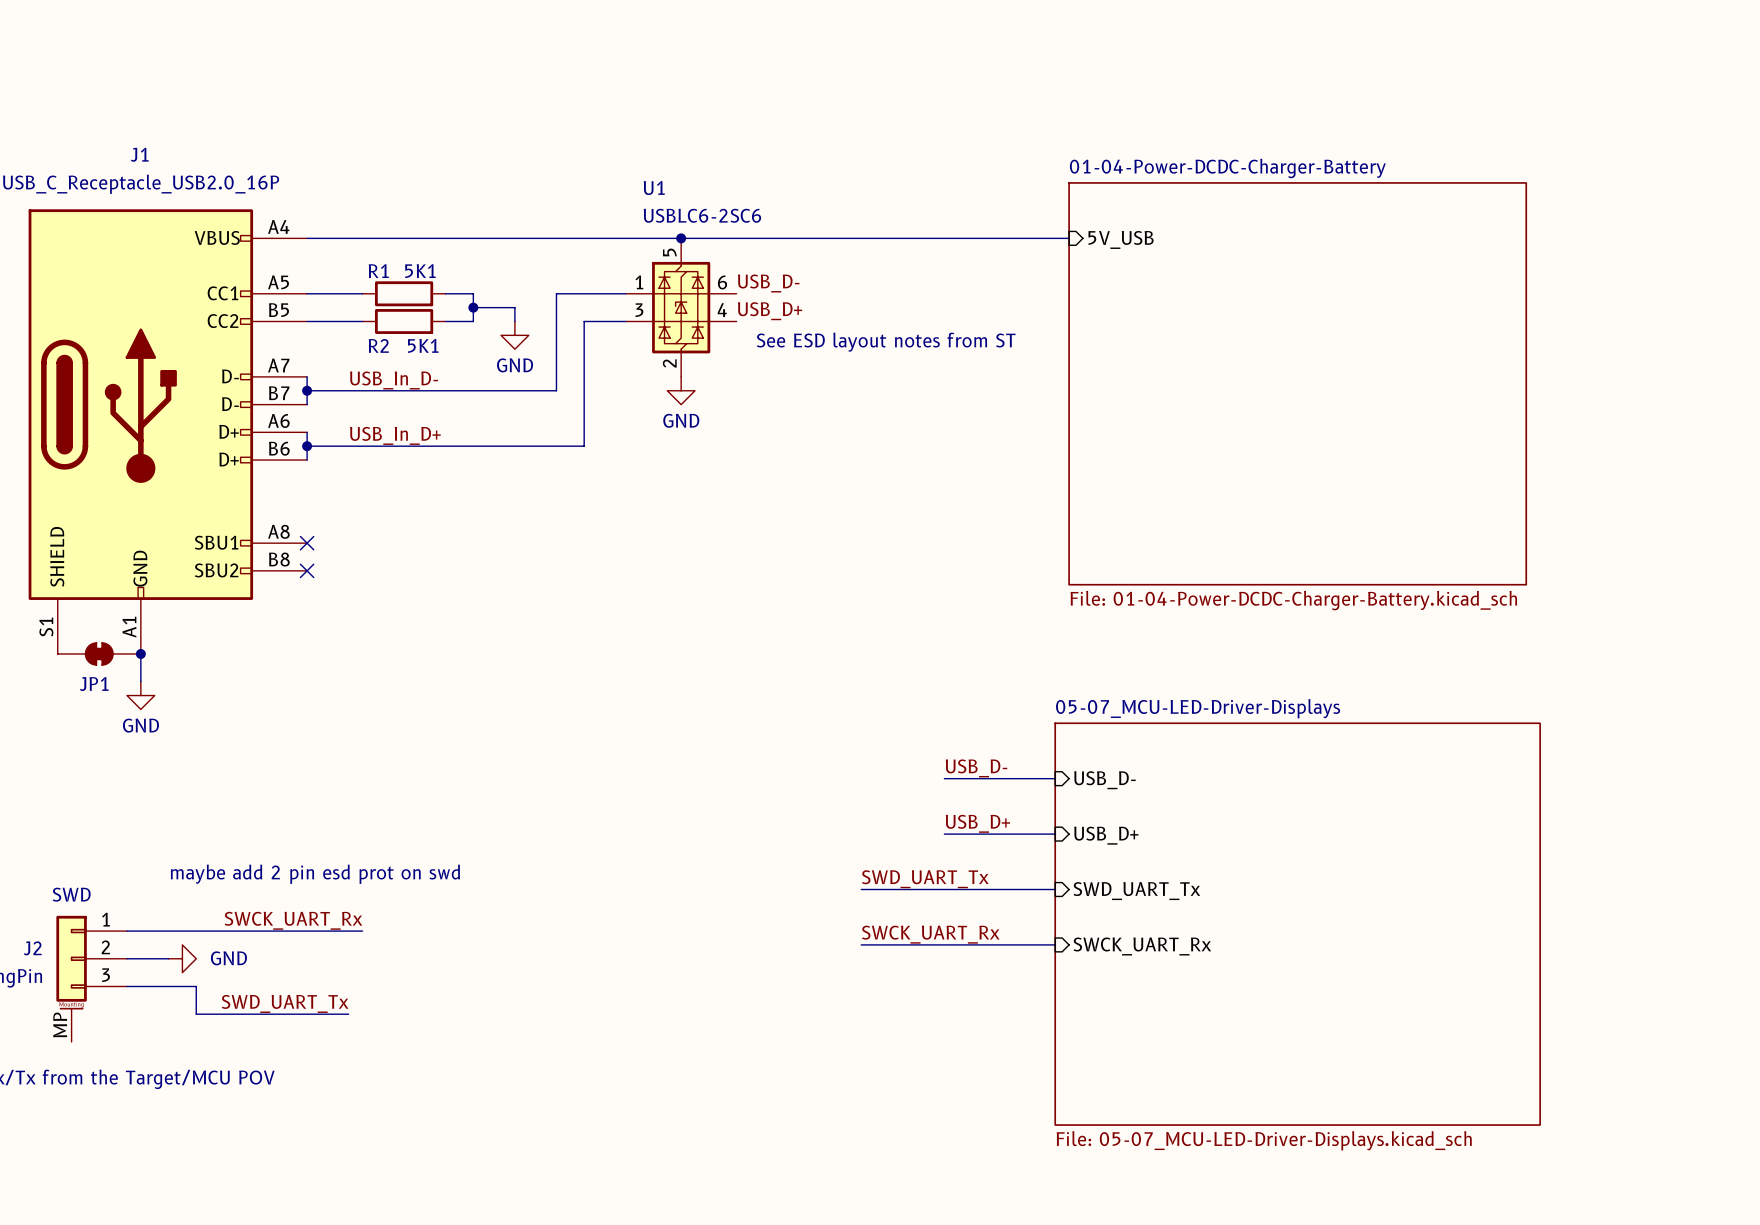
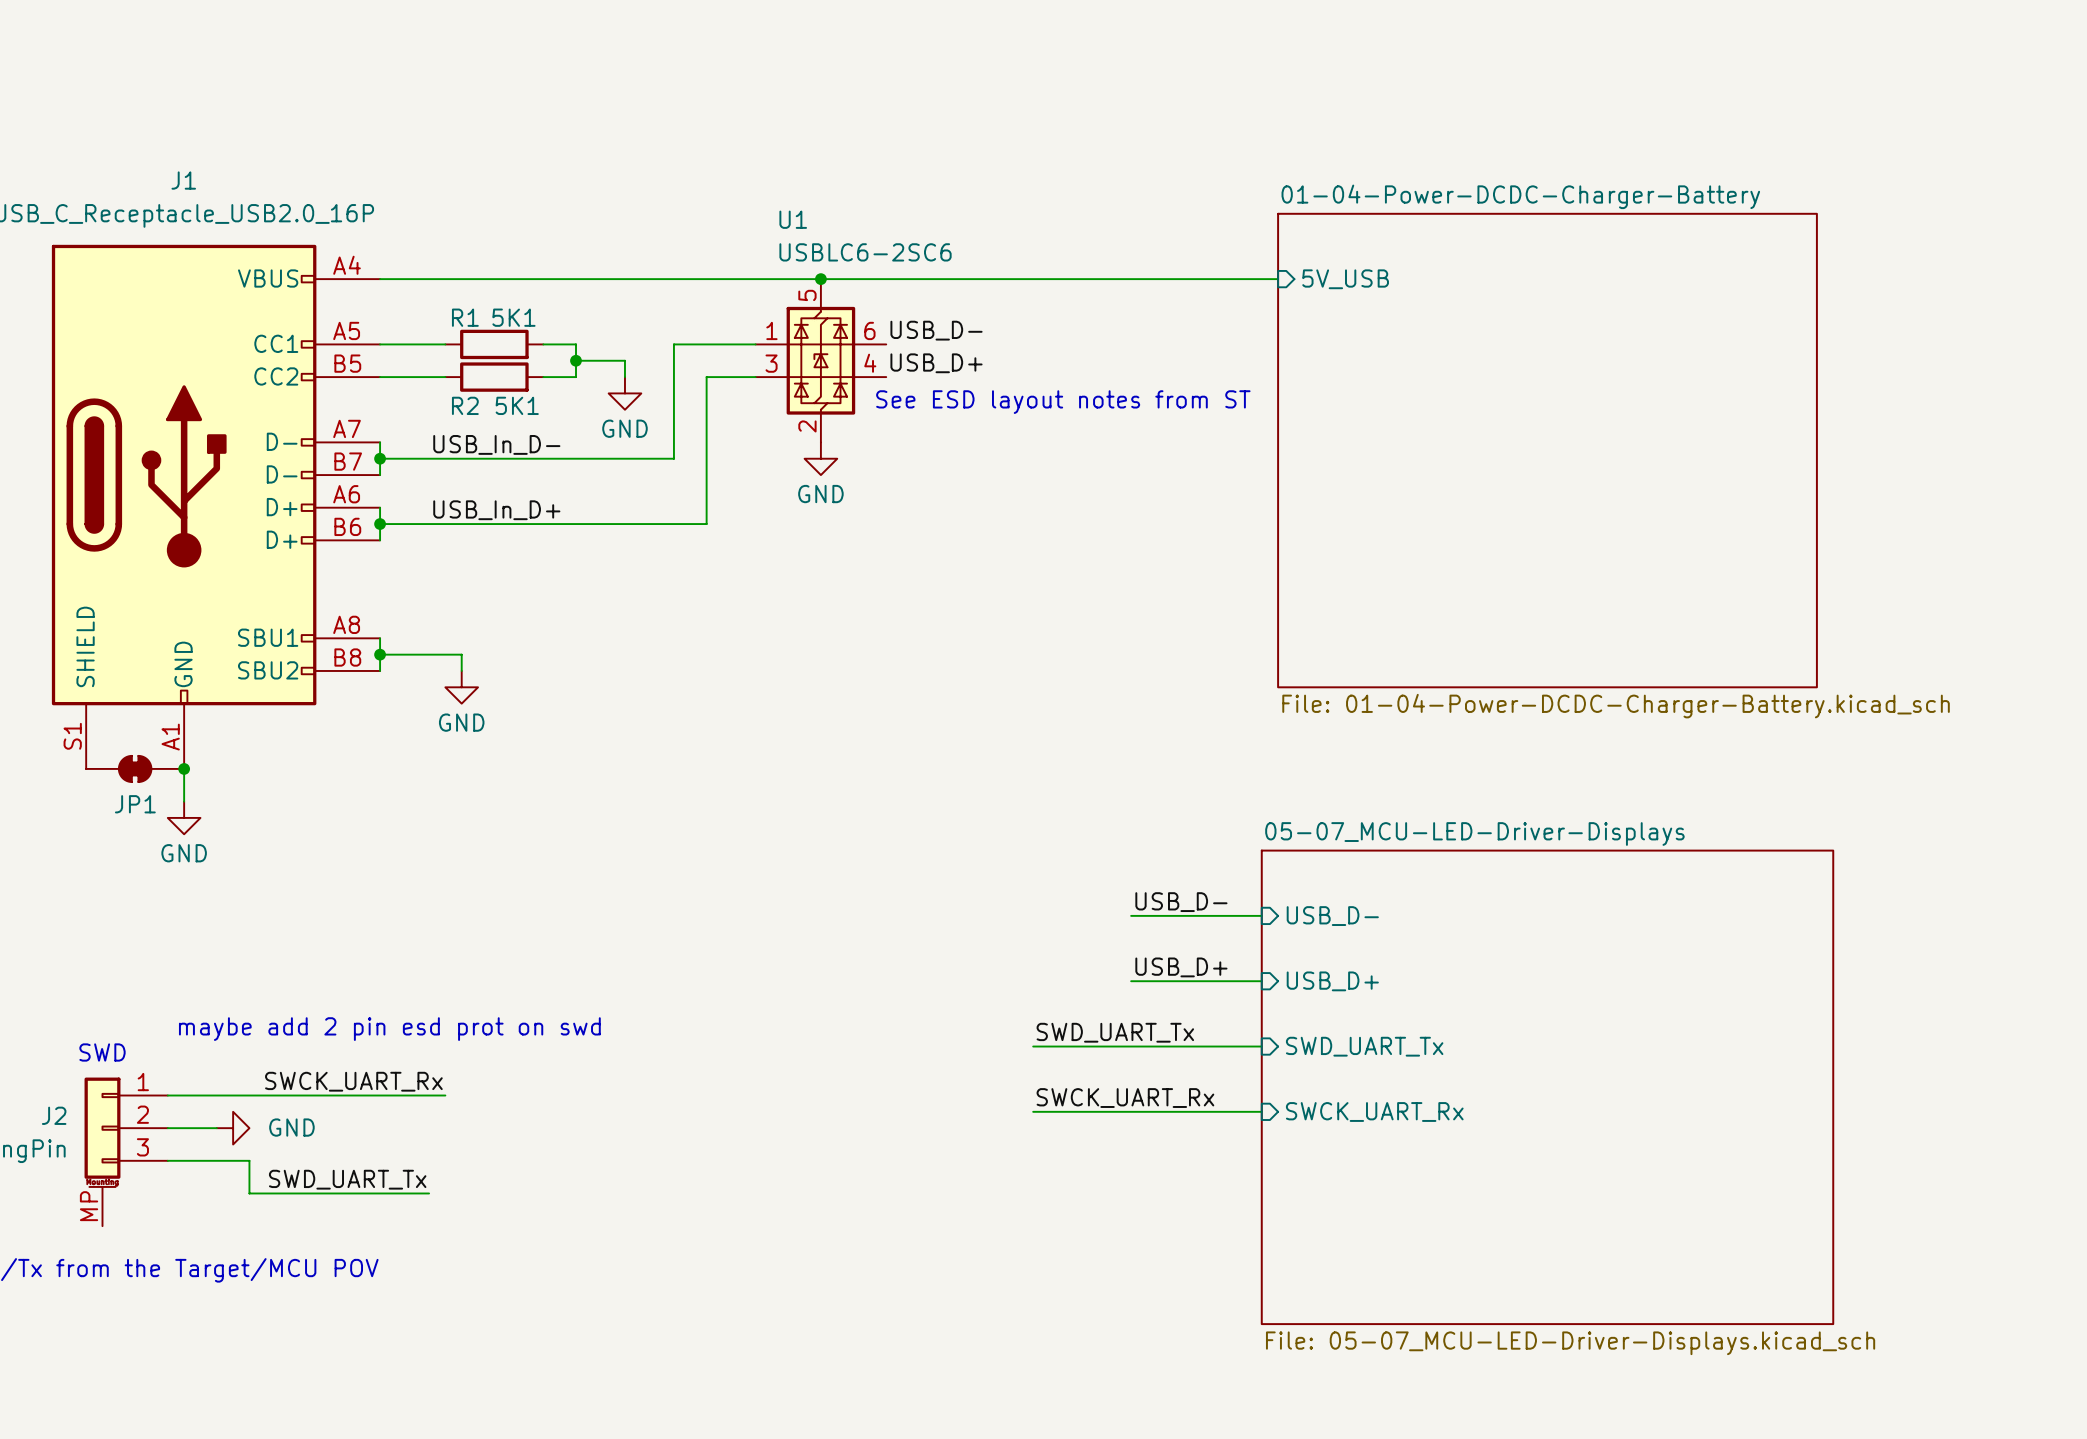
wire: none -> (380, 638) (380, 670)
no-connect mark: (307, 543) -> none
wire: none -> (380, 654) (461, 654) (461, 670)
junction: none -> (380, 654)
no-connect mark: (307, 570) -> none
power symbol: none -> GND (461, 687)

